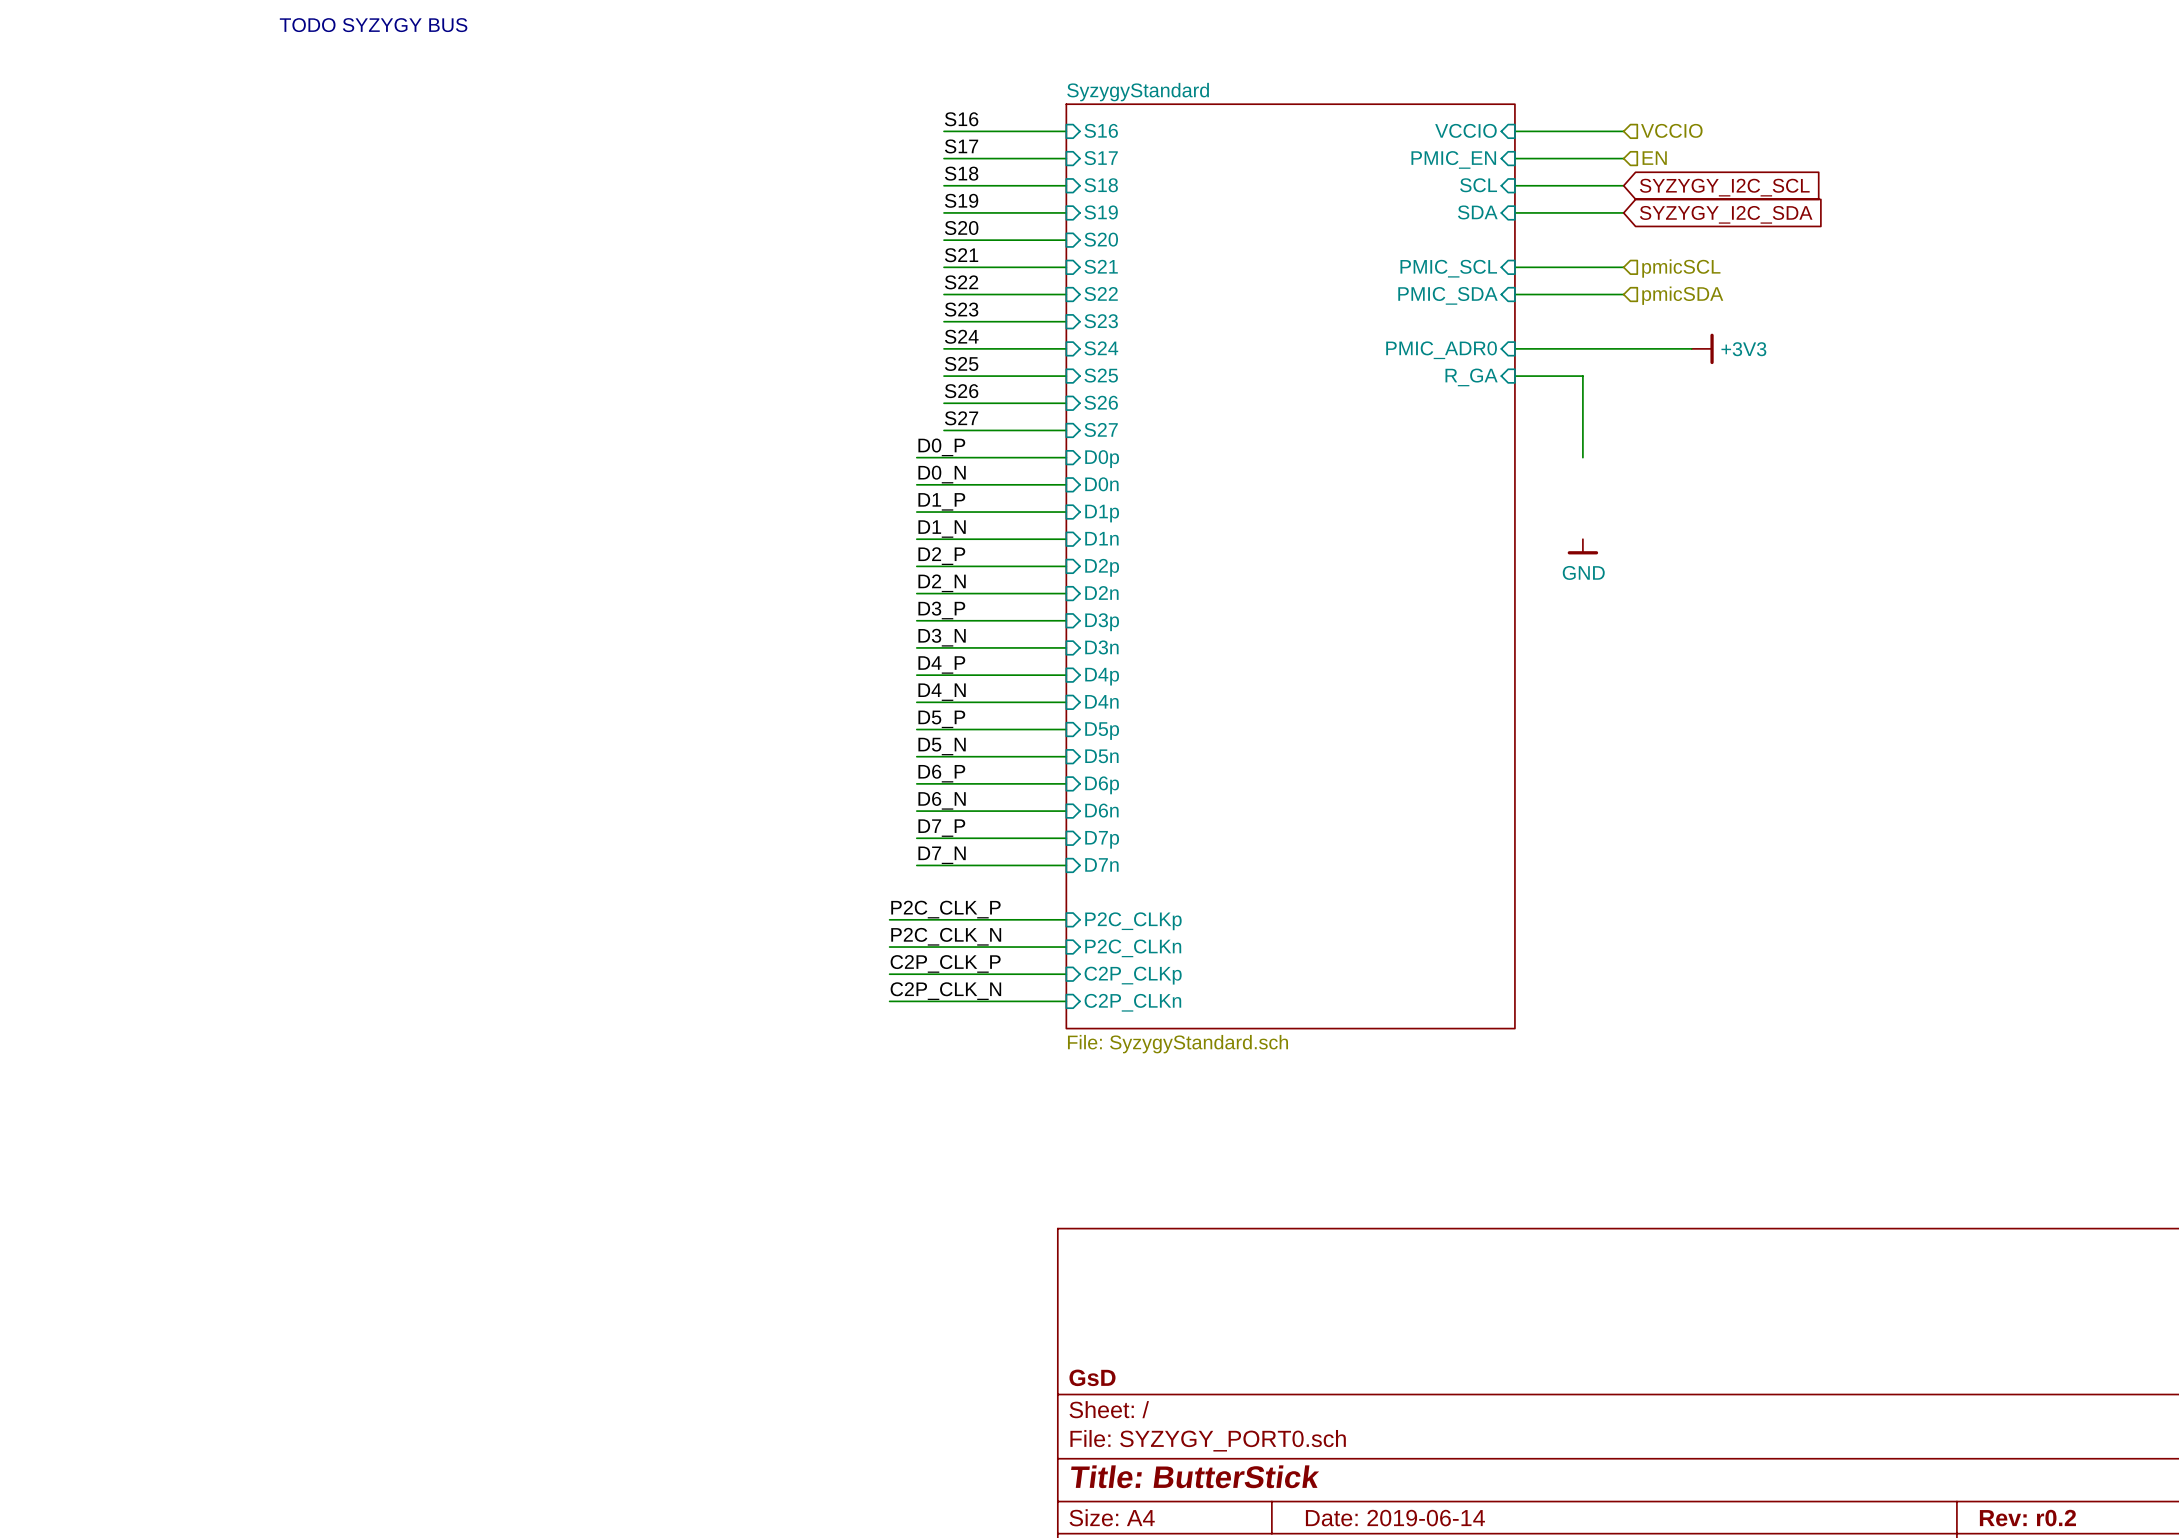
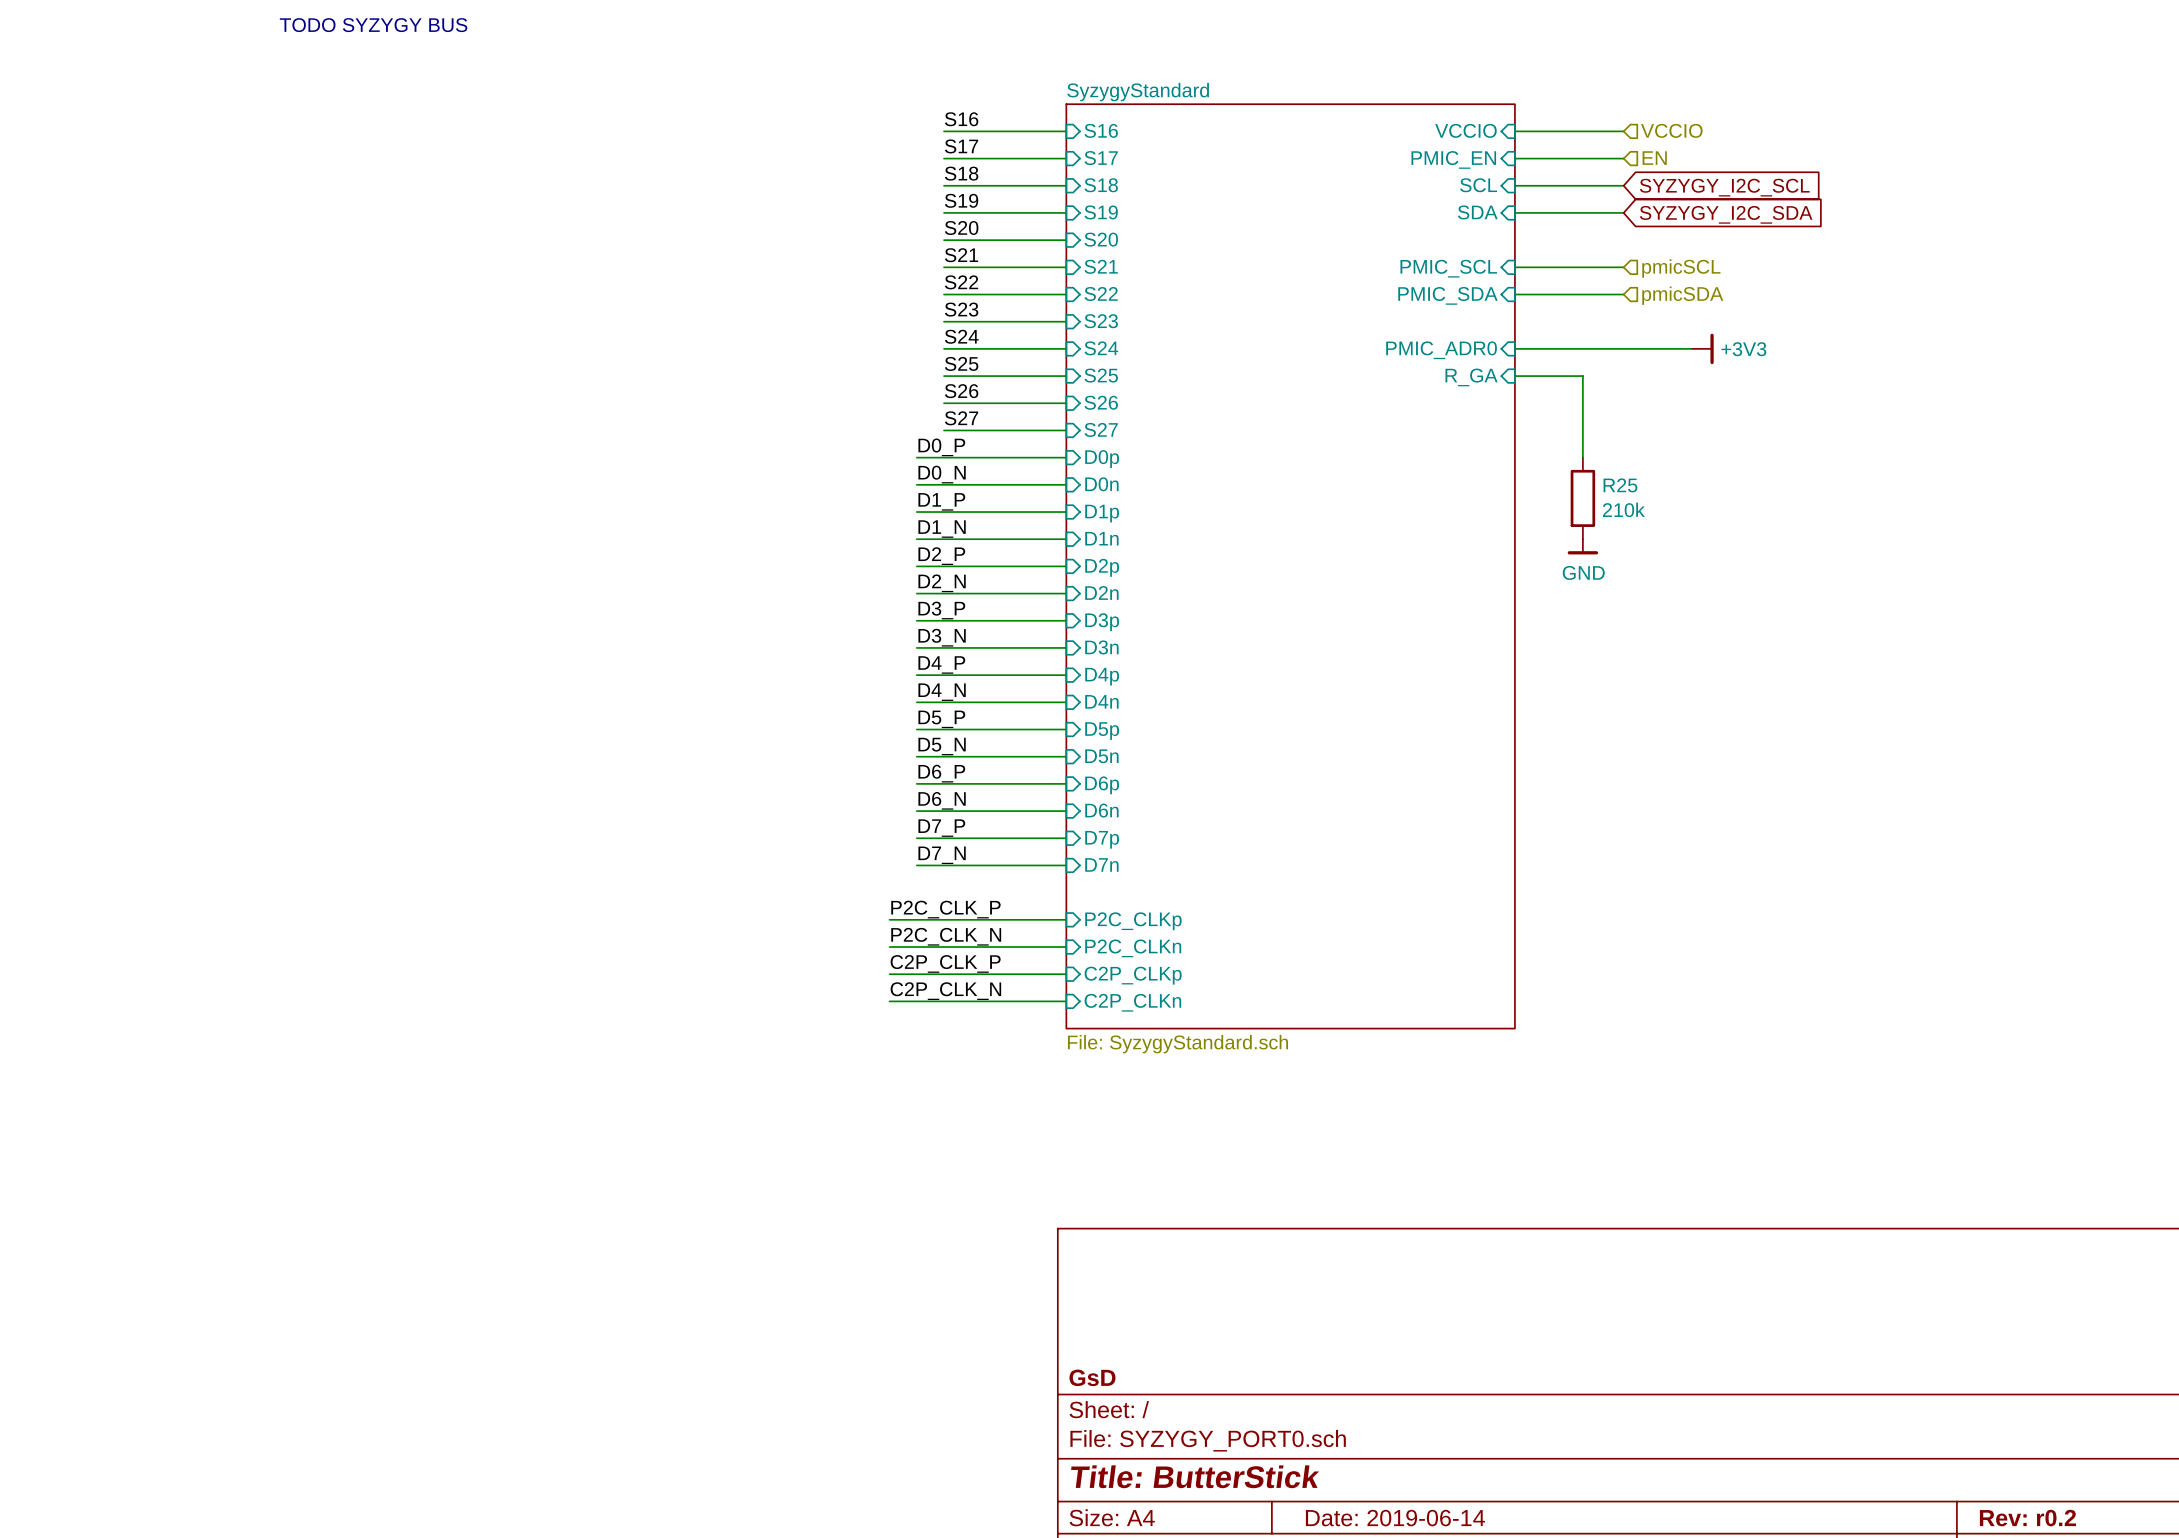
R25: none -> 210k (1582, 498)

